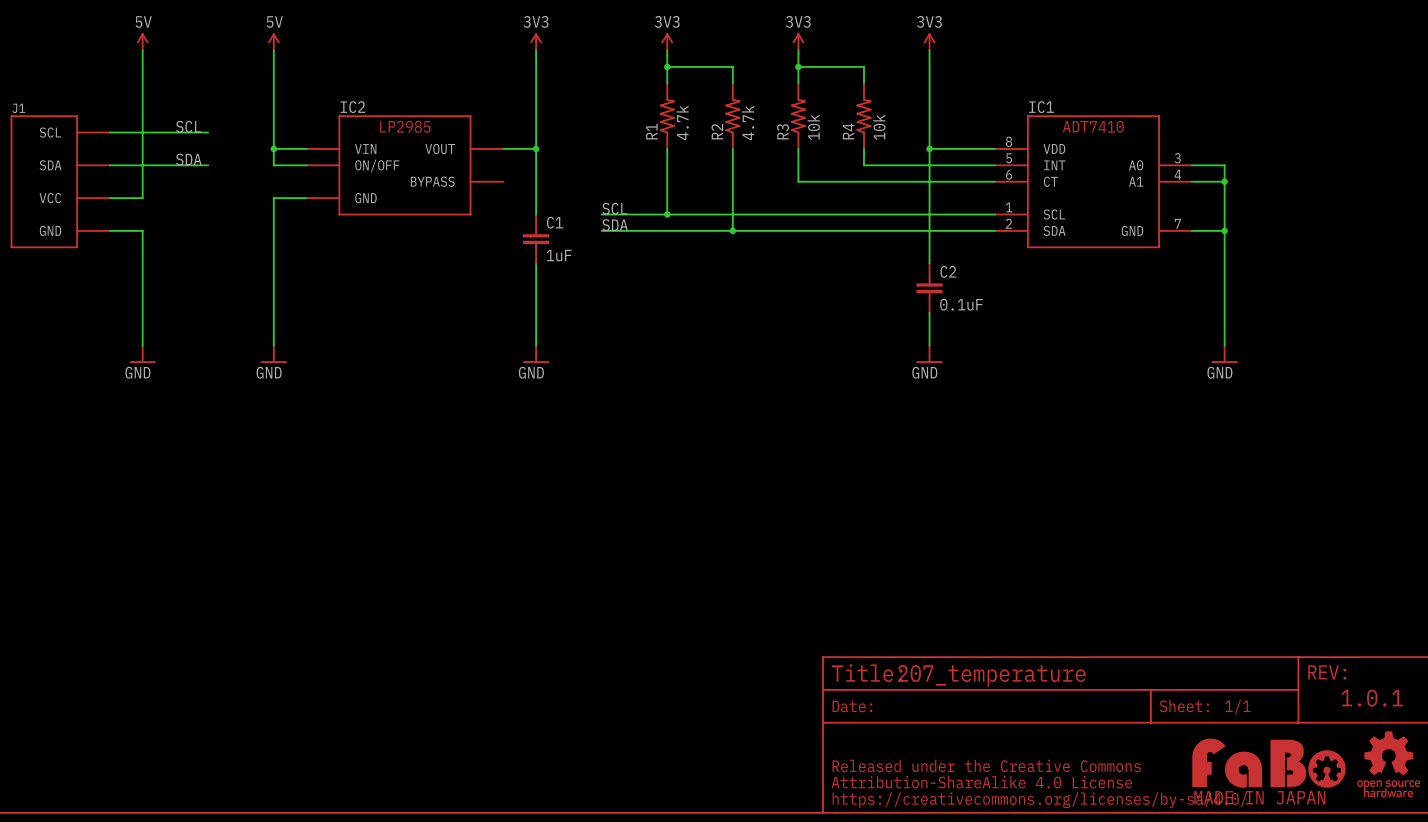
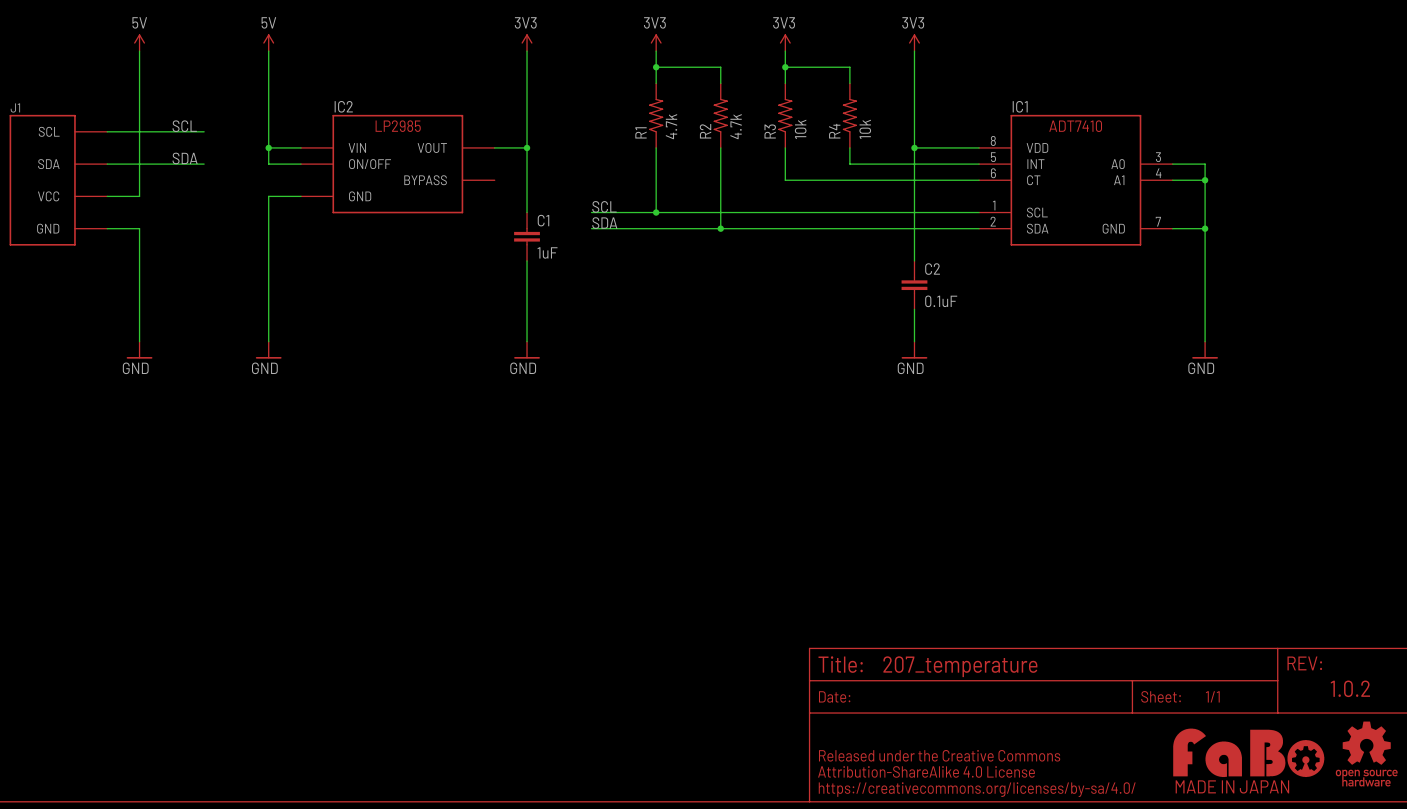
text: 1.0.1 (1372, 698) -> 1.0.2 (1350, 688)

